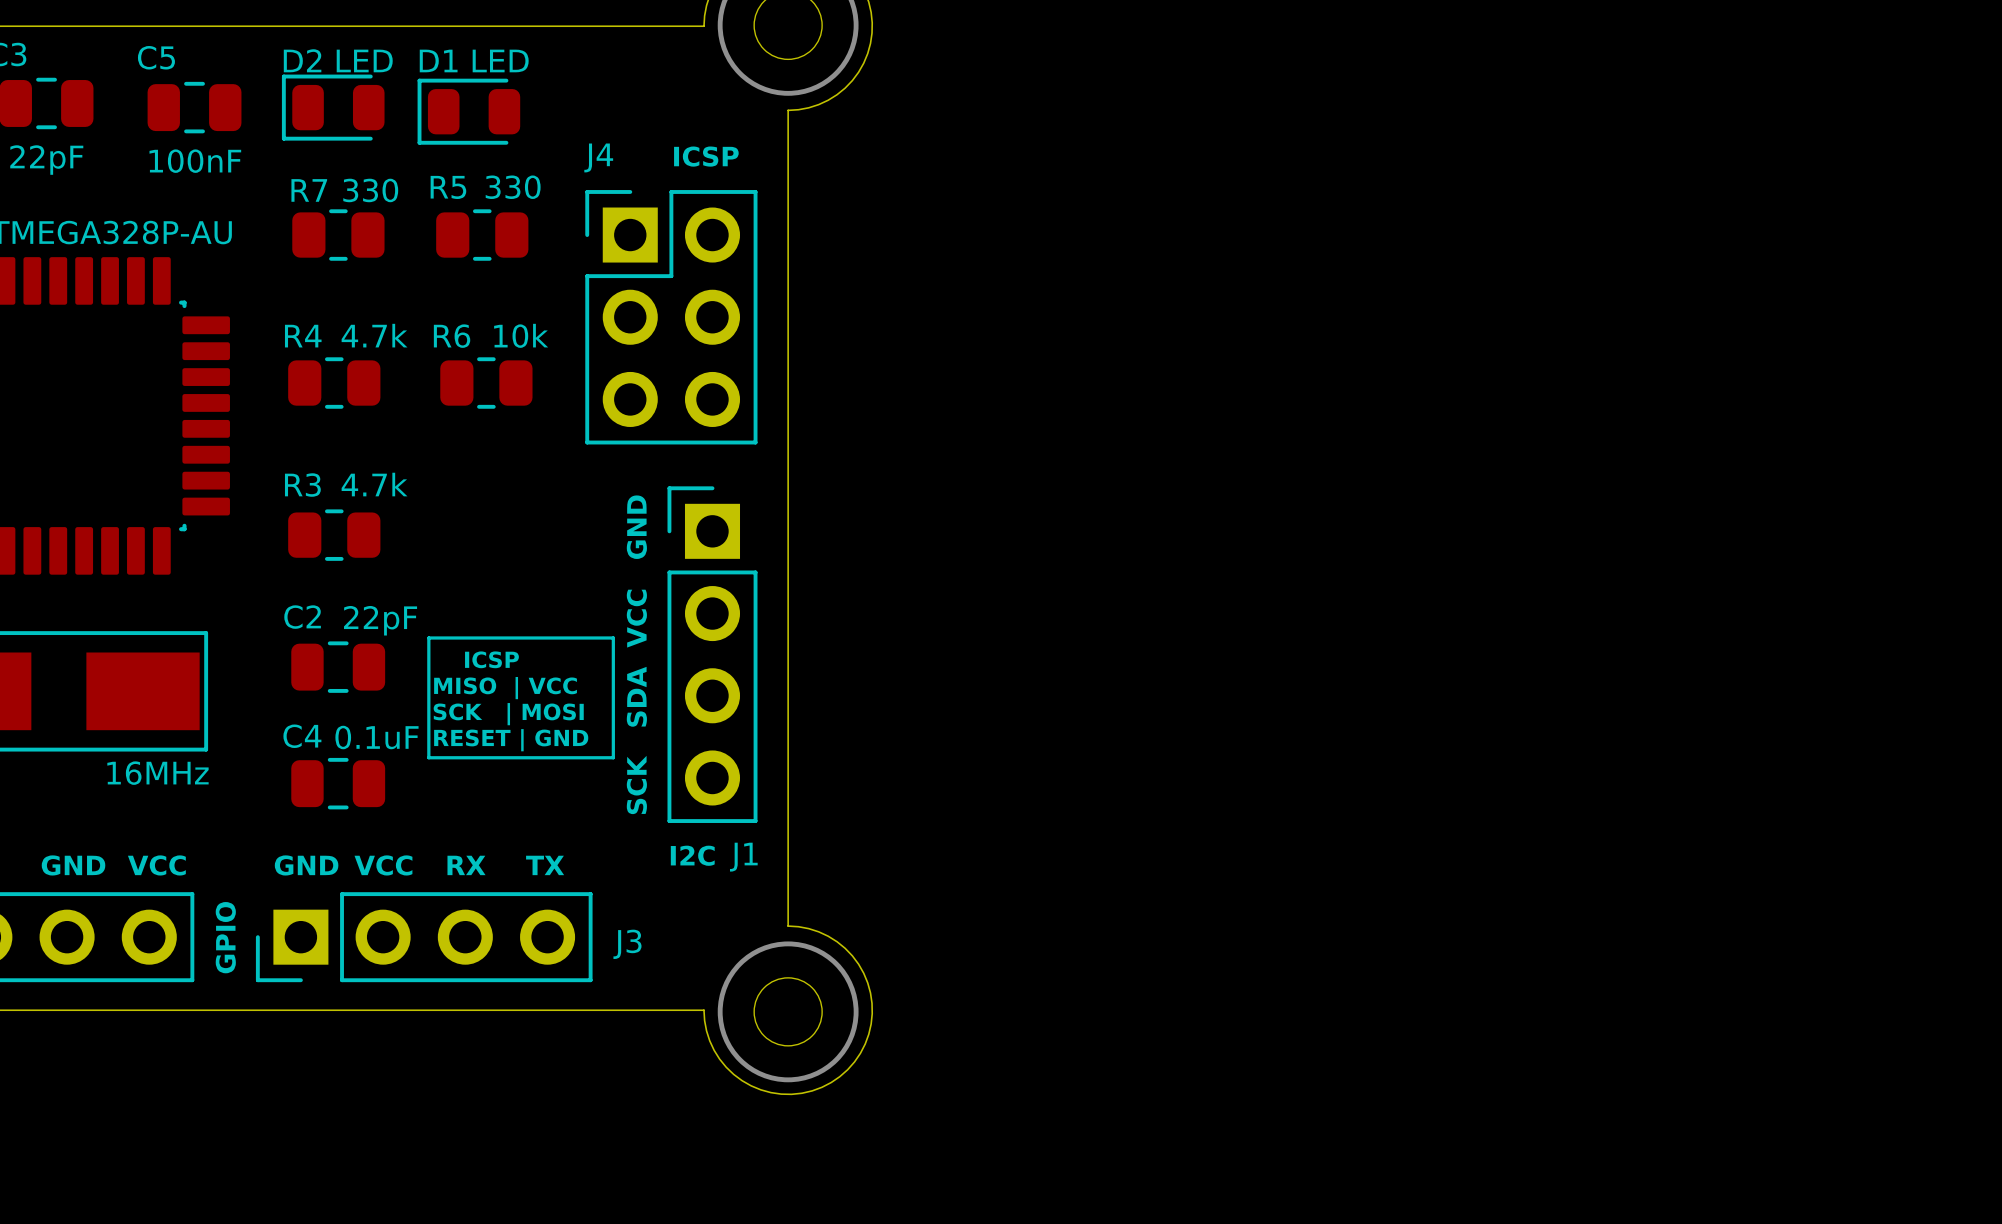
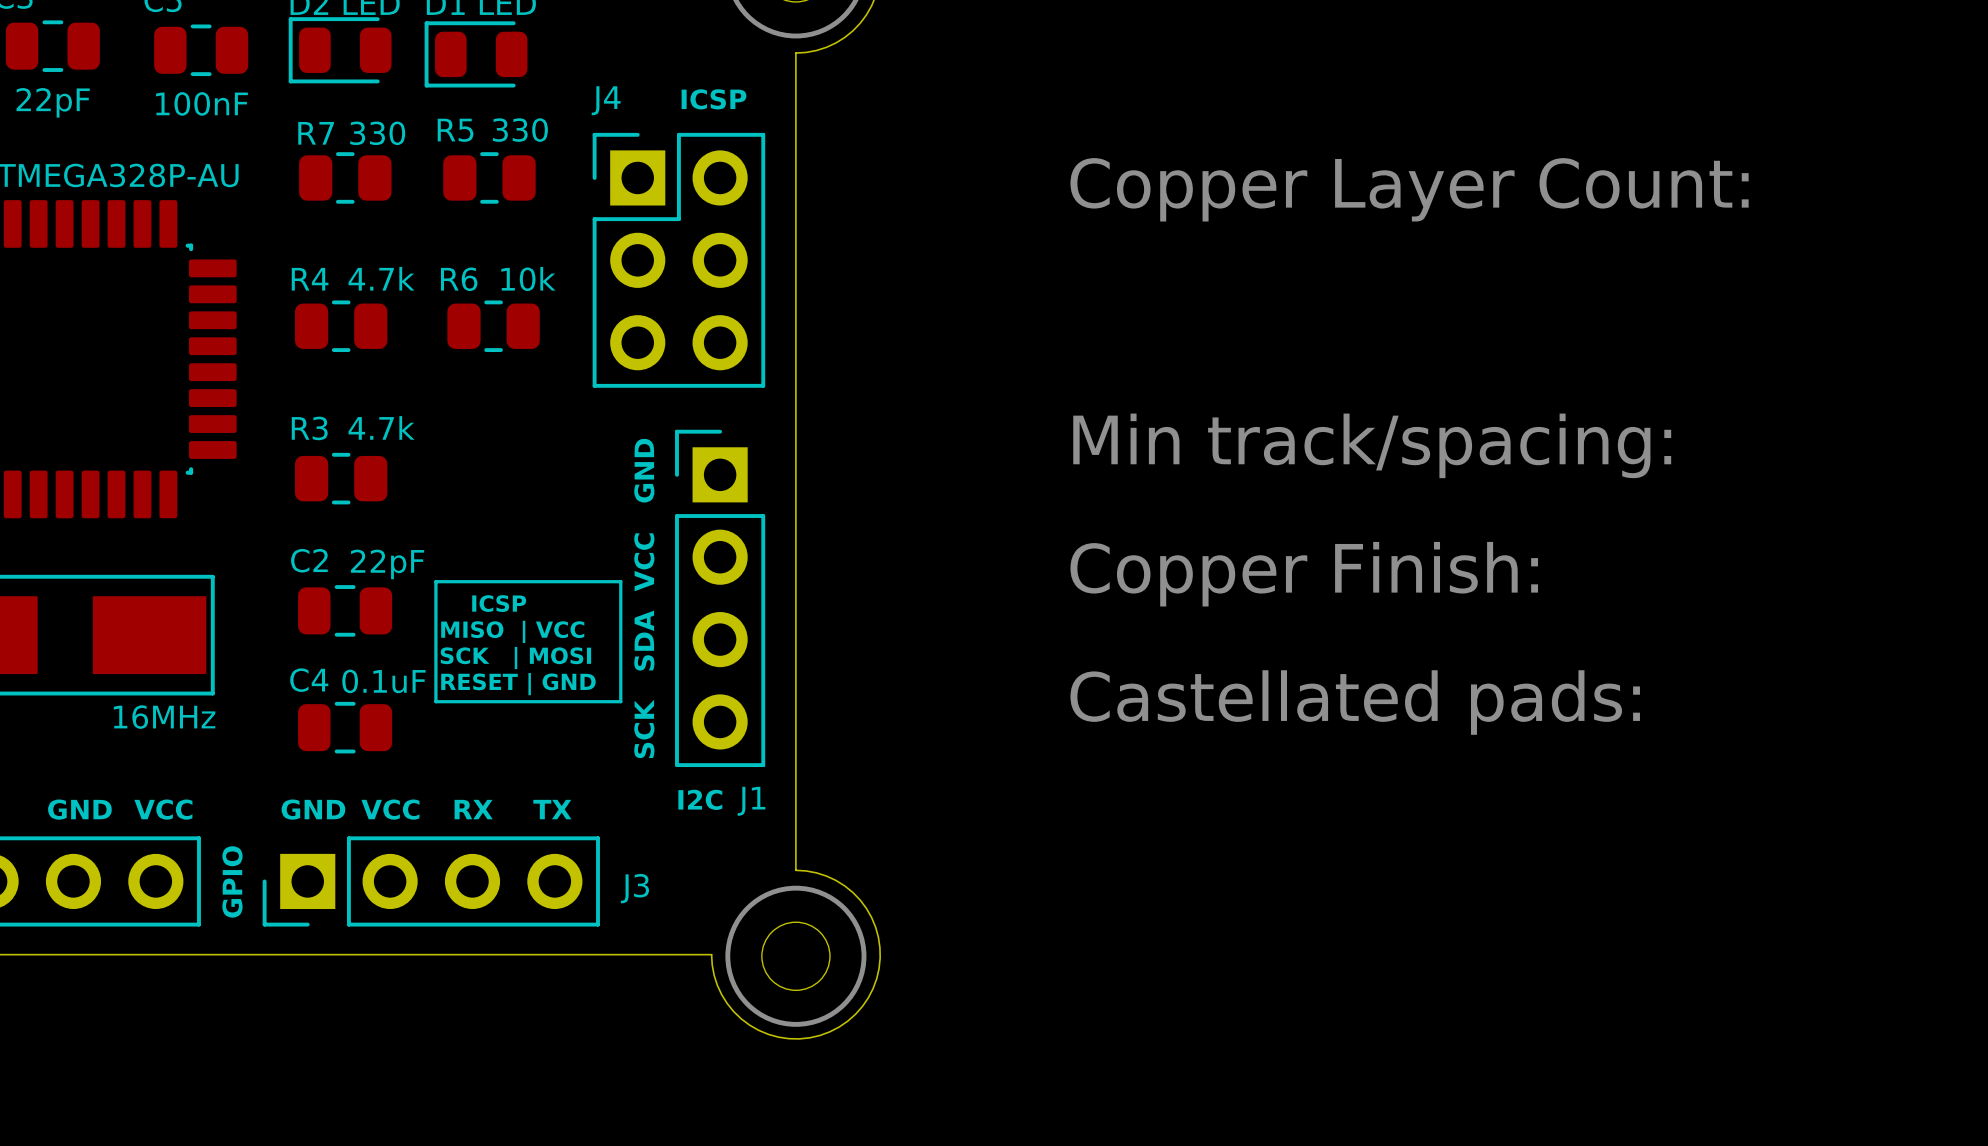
text: none -> Copper Layer Count: (1409, 189)
text: none -> Min track/spacing: (1372, 445)
text: none -> Copper Finish: (1304, 574)
text: none -> Castellated pads: (1355, 702)

